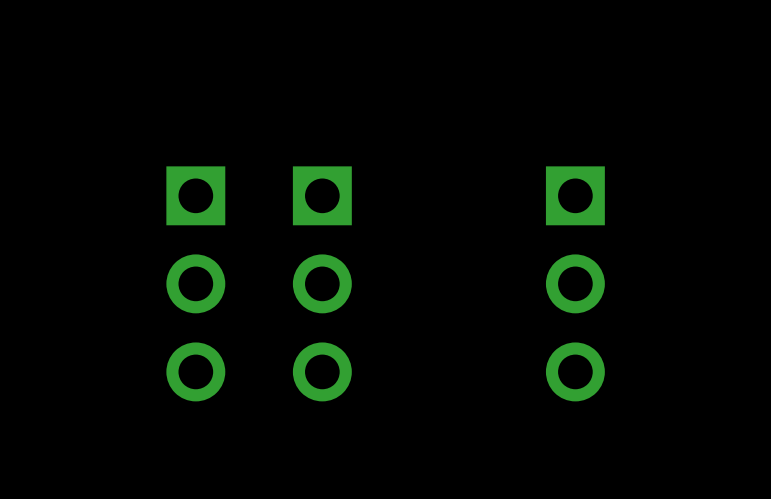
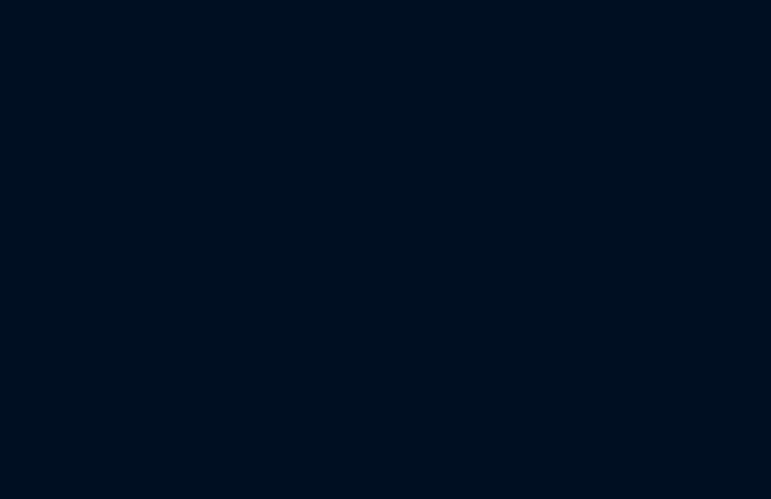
part: (195, 283) -> none
part: (322, 283) -> none
part: (575, 283) -> none

